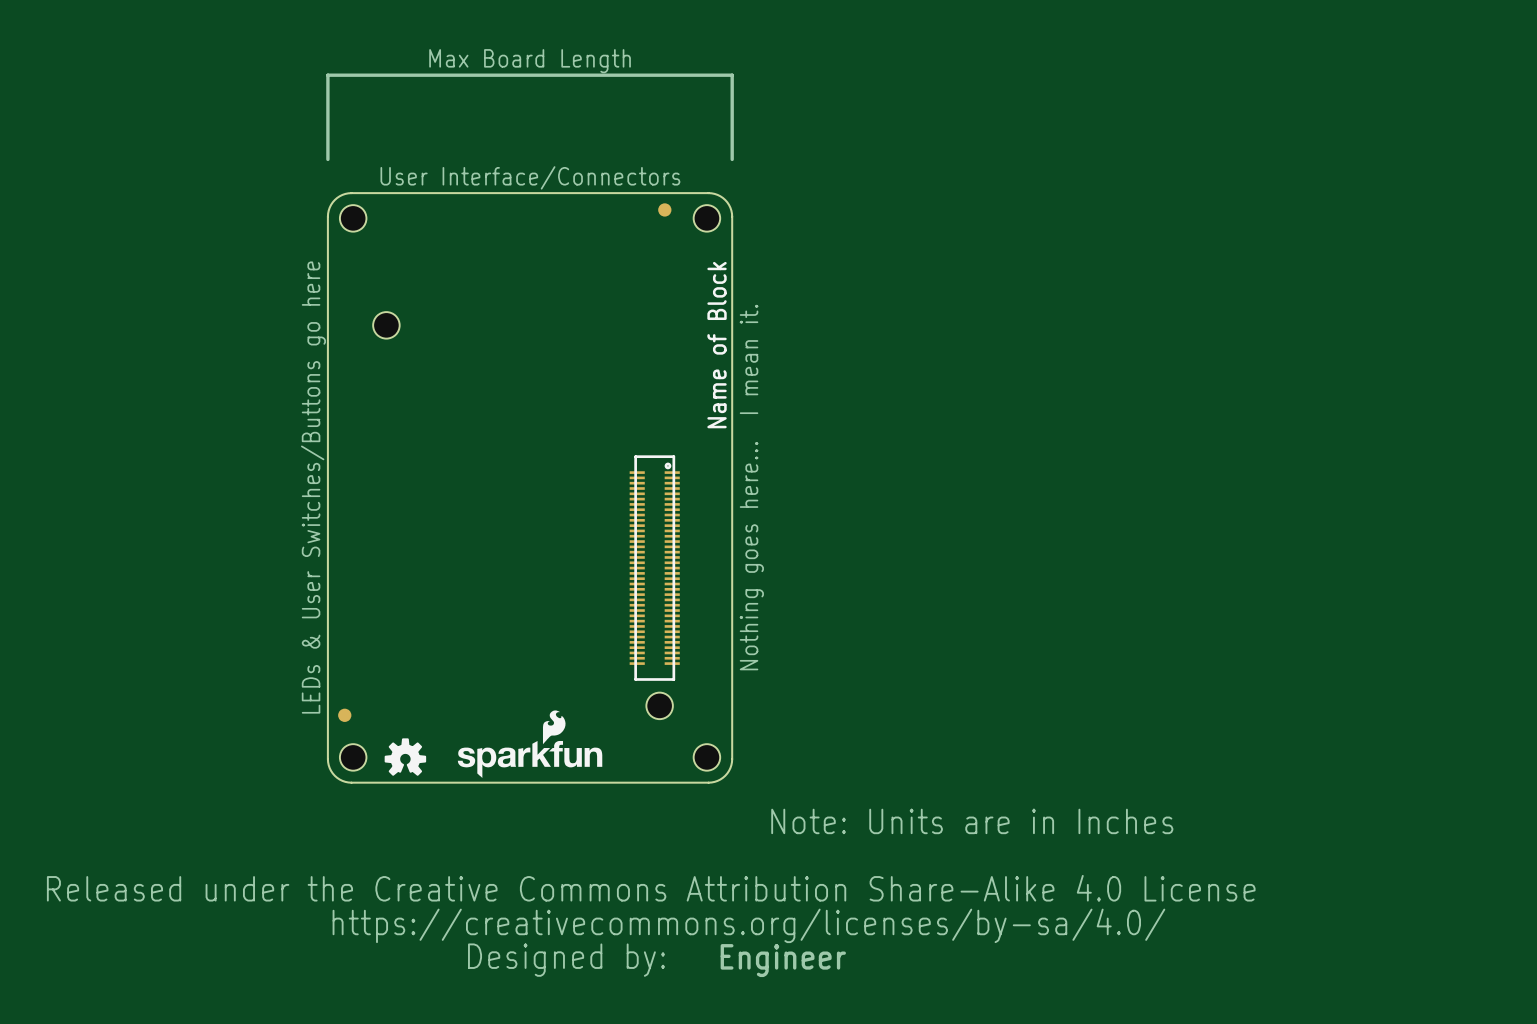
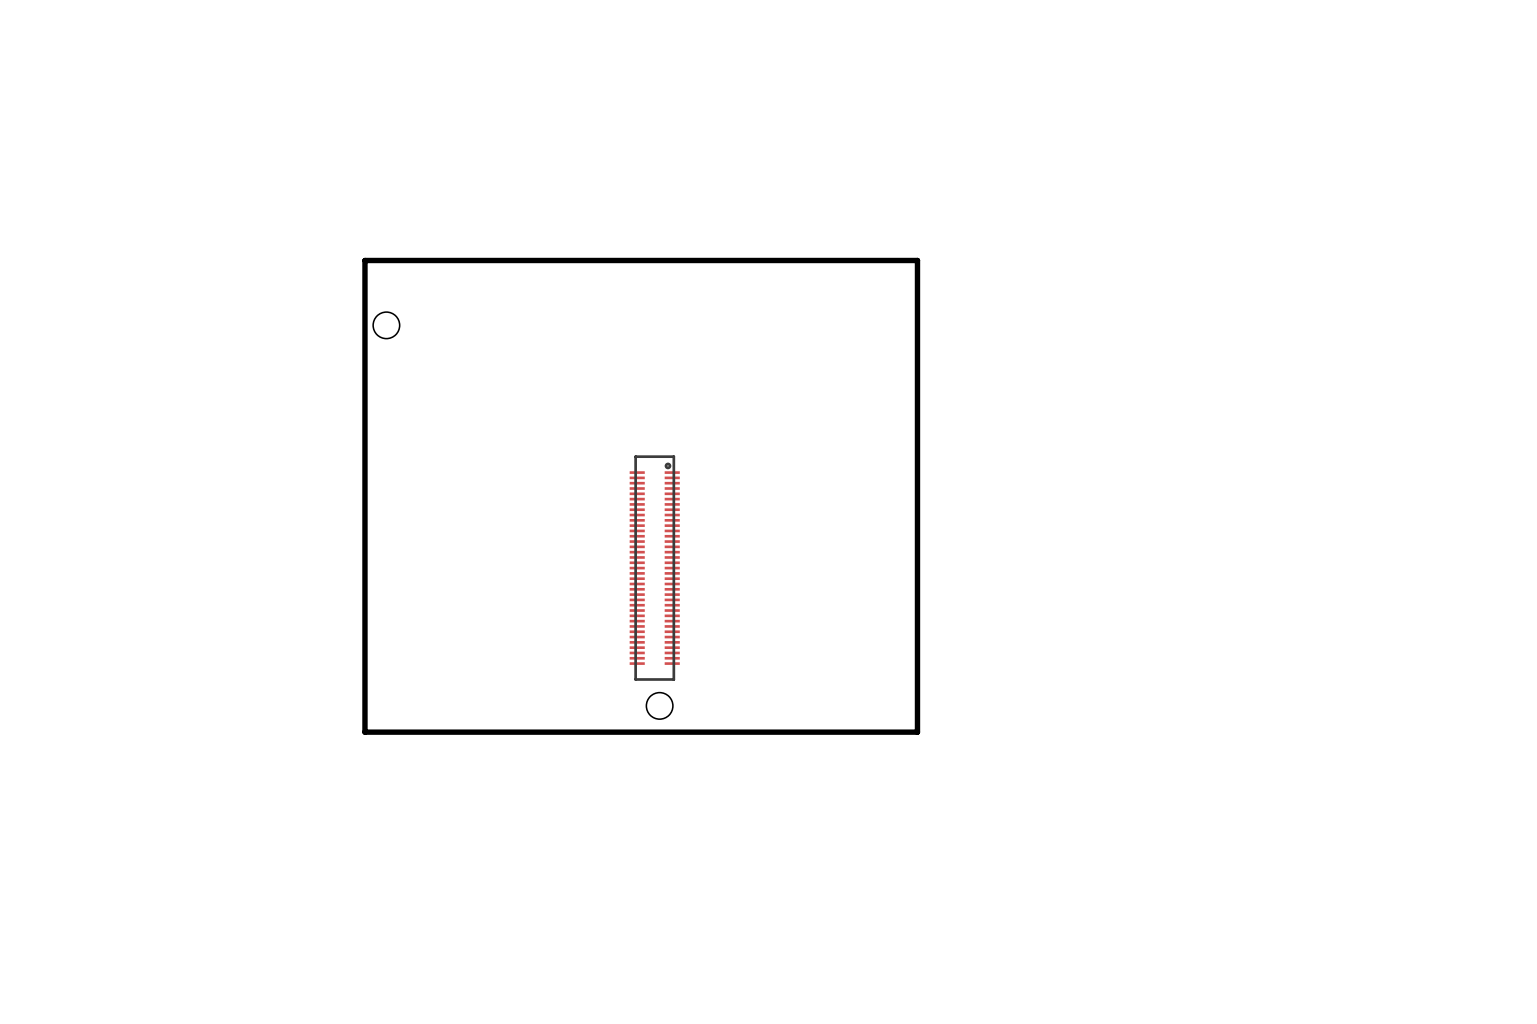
text: Max Board Length (530, 61) -> none
line: (327, 159) (327, 75) (732, 75) (732, 159) -> none
text: User Interface/Connectors (530, 177) -> none
board edge: (351, 193) (708, 193) (720, 196) (729, 204) (732, 216) (732, 759) (729, 770) (720, 779) (708, 782) (351, 782) (339, 779) (331, 770) (327, 759) (327, 216) (329, 207) (334, 200) (342, 194) (351, 193) -> (364, 260) (364, 732) (917, 732) (917, 260) (364, 260)
part: (664, 209) -> none
hole: (353, 218) -> none
hole: (706, 218) -> none
text: Name of Block (717, 345) -> none
text: LEDs & User Switches/Buttons go here (313, 487) -> none
text: Nothing goes here... I mean it. (751, 487) -> none
drawing: [457, 710, 603, 778] -> none
part: (344, 715) -> none
drawing: [384, 738, 427, 776] -> none
hole: (353, 757) -> none
hole: (706, 757) -> none
text: Note: Units are in Inches (972, 821) -> none
drawing: [46, 874, 1256, 977] -> none
text: Engineer (783, 960) -> none

